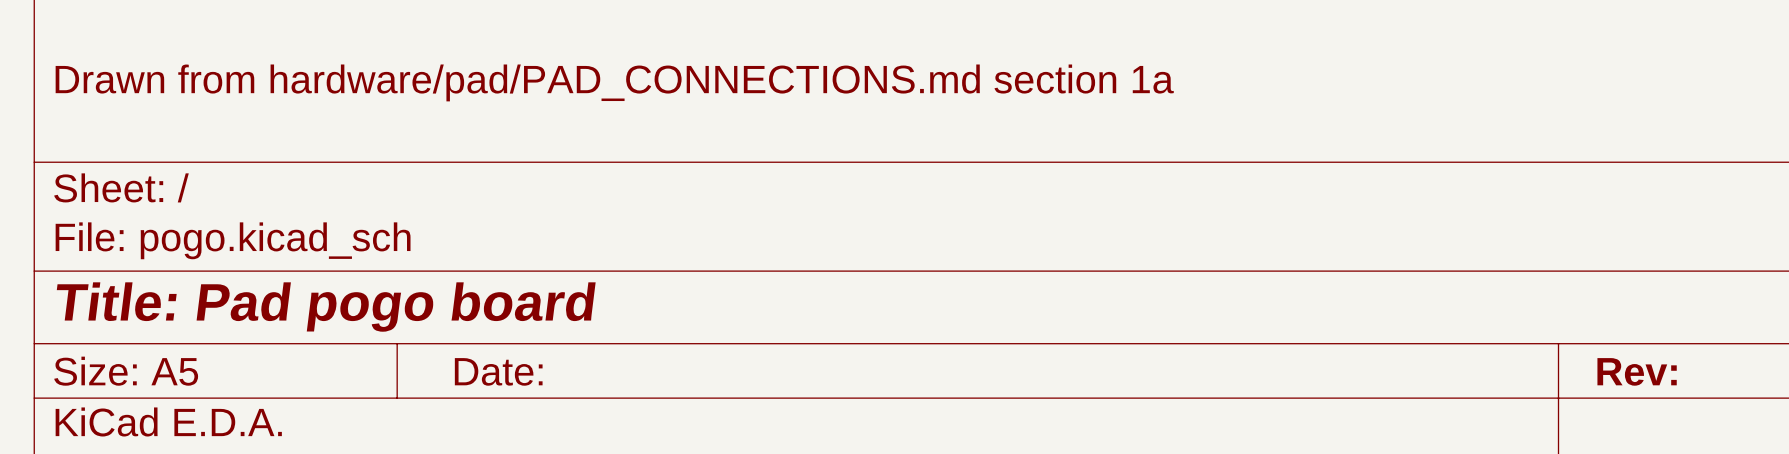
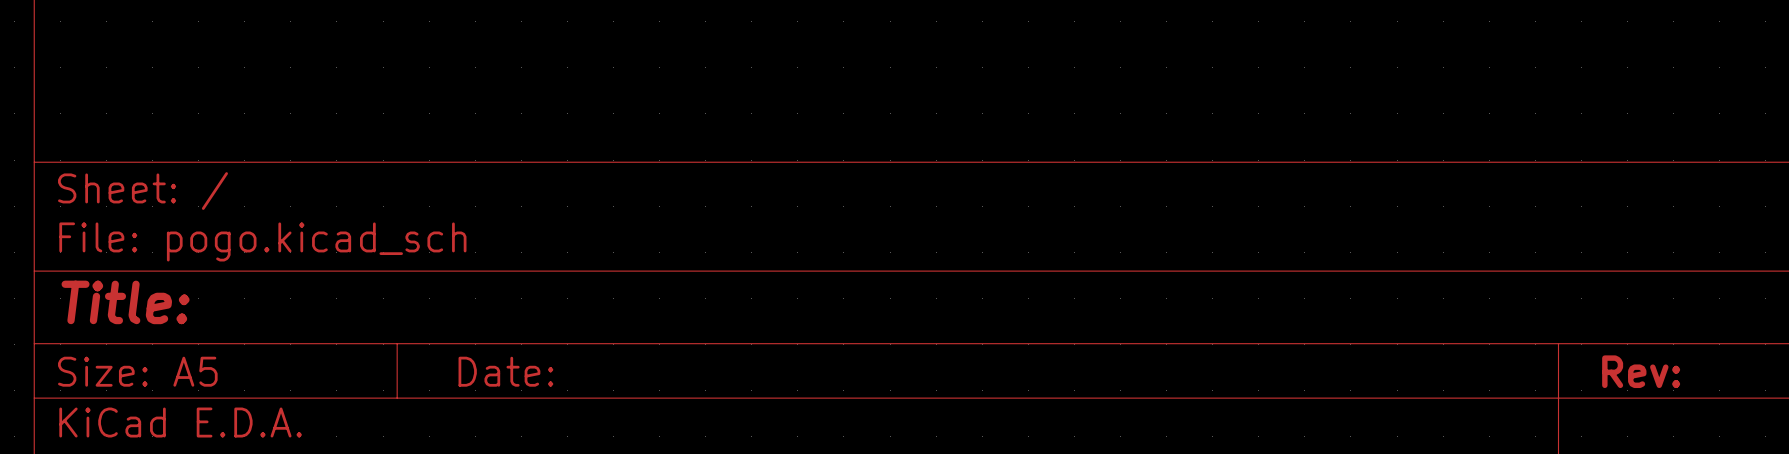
title block: Drawn from hardware/pad/PAD_CONNECTIONS.md section 1a (614, 82) -> none
title block: Title: Pad pogo board (326, 307) -> Title: (125, 302)

